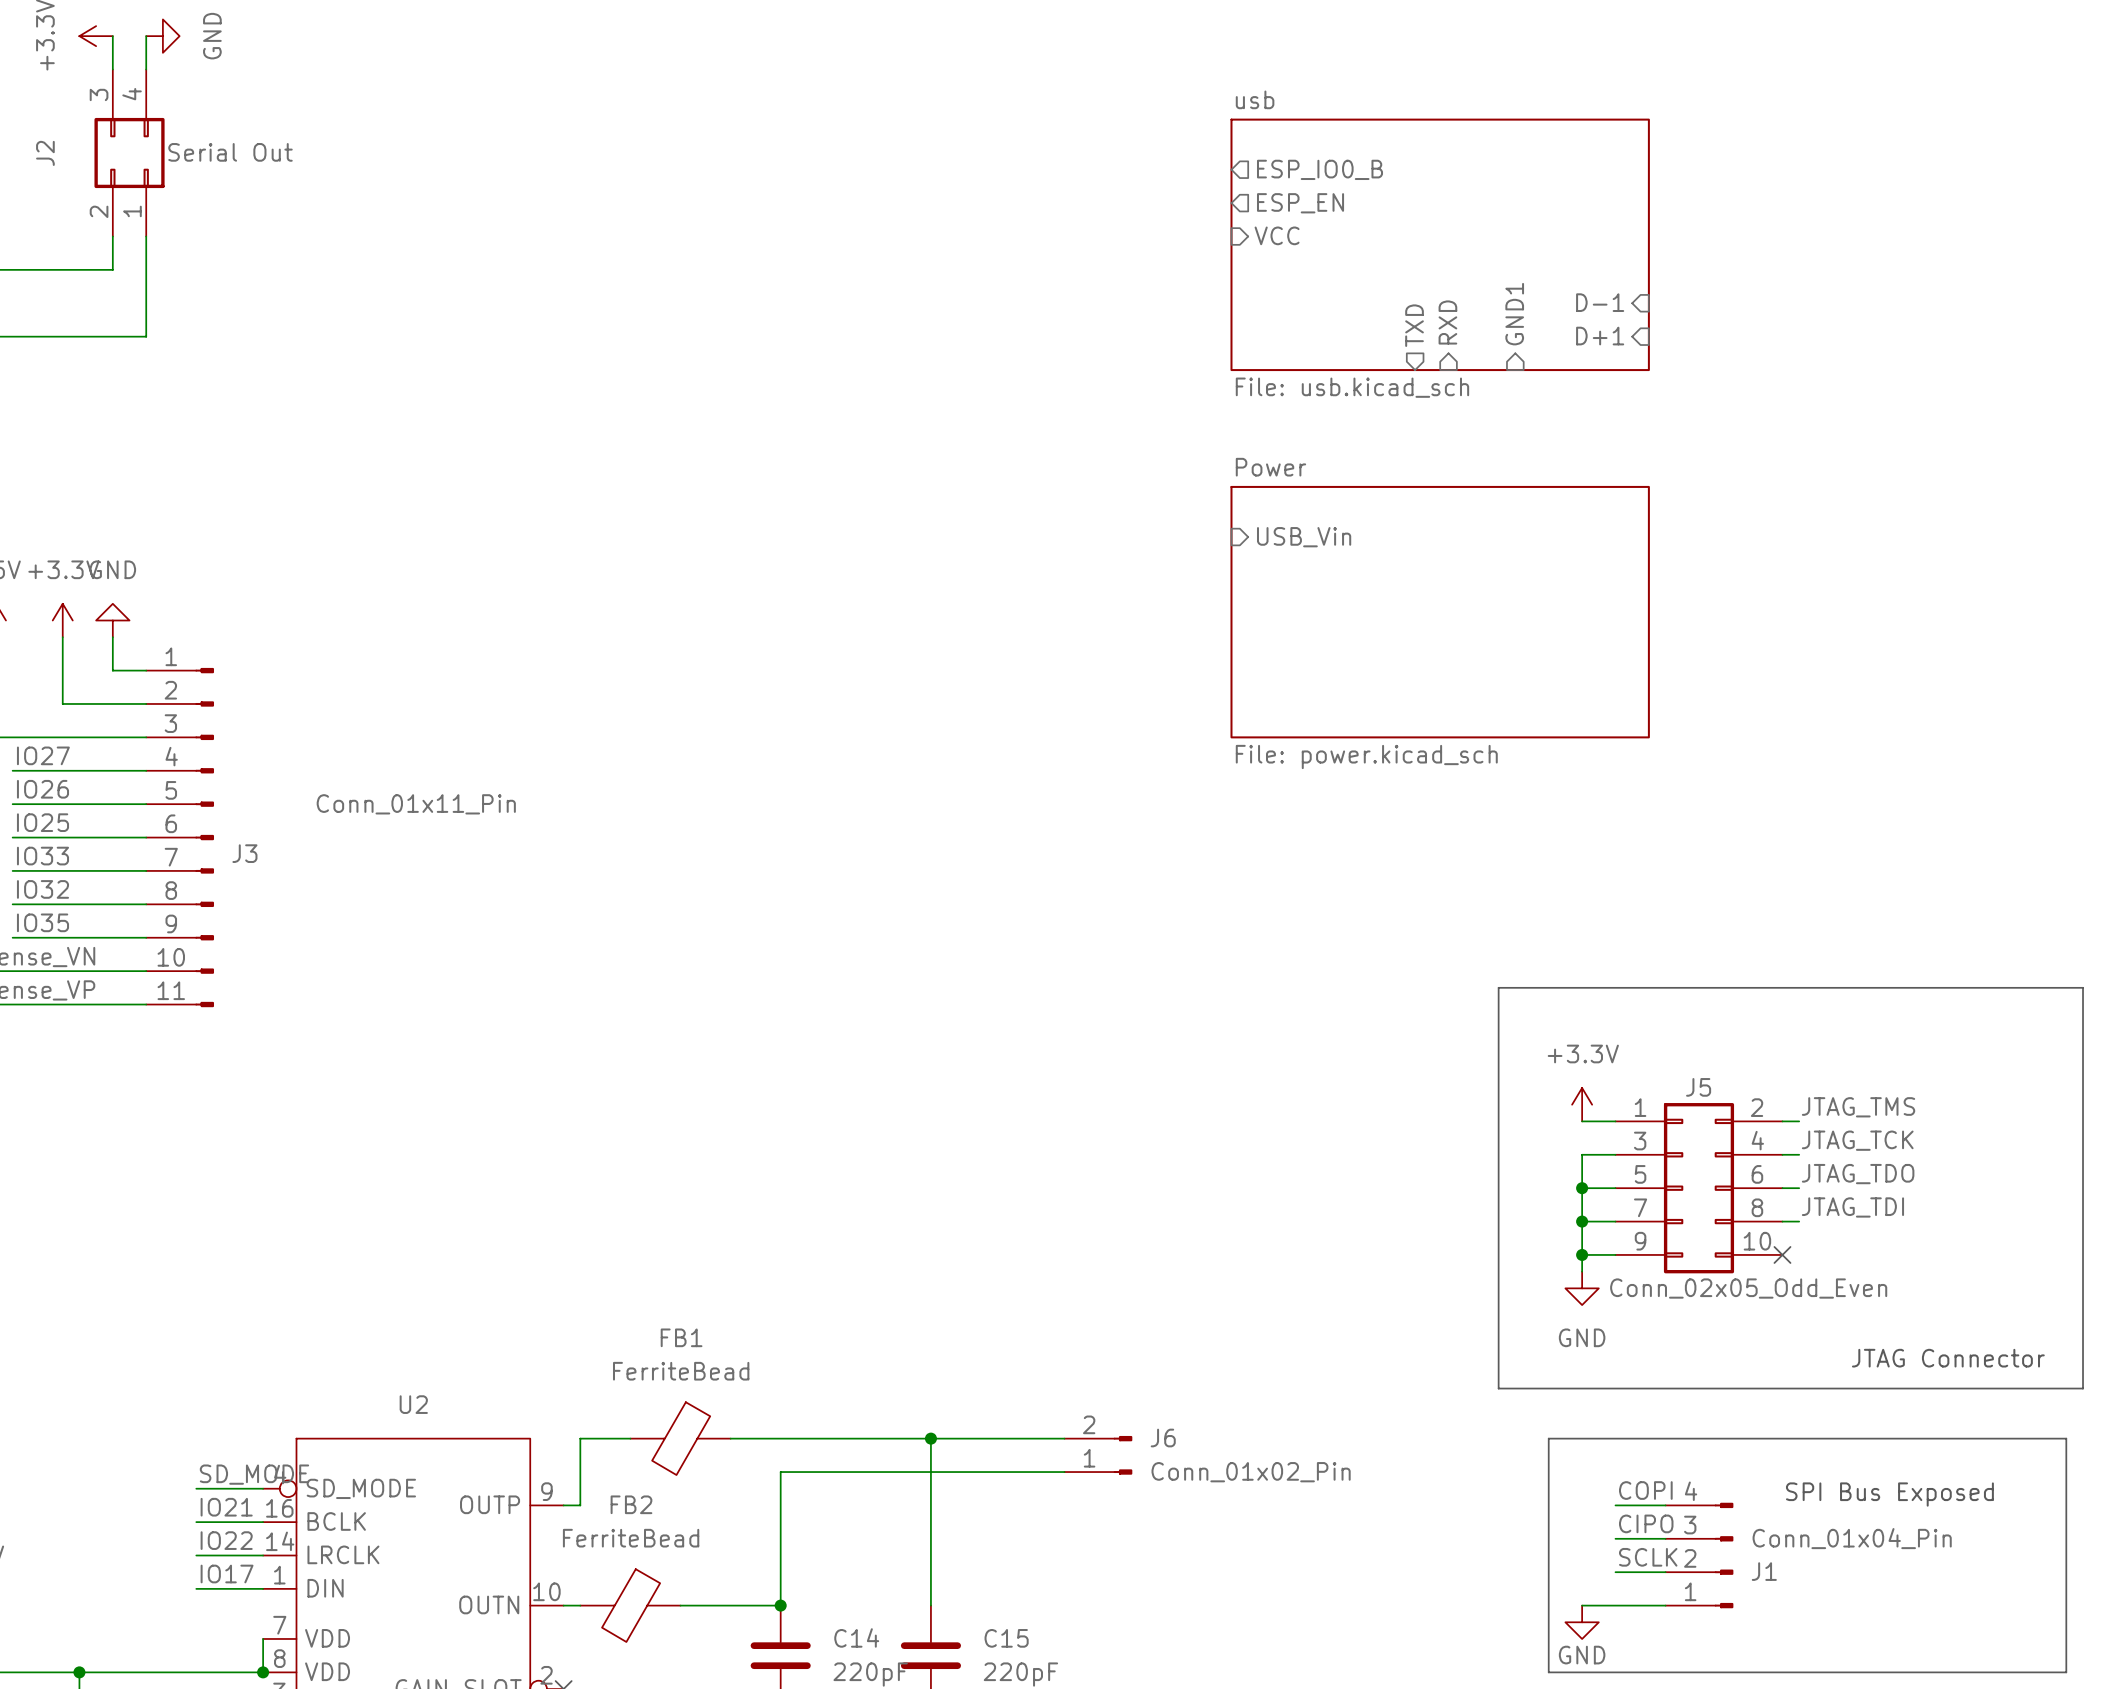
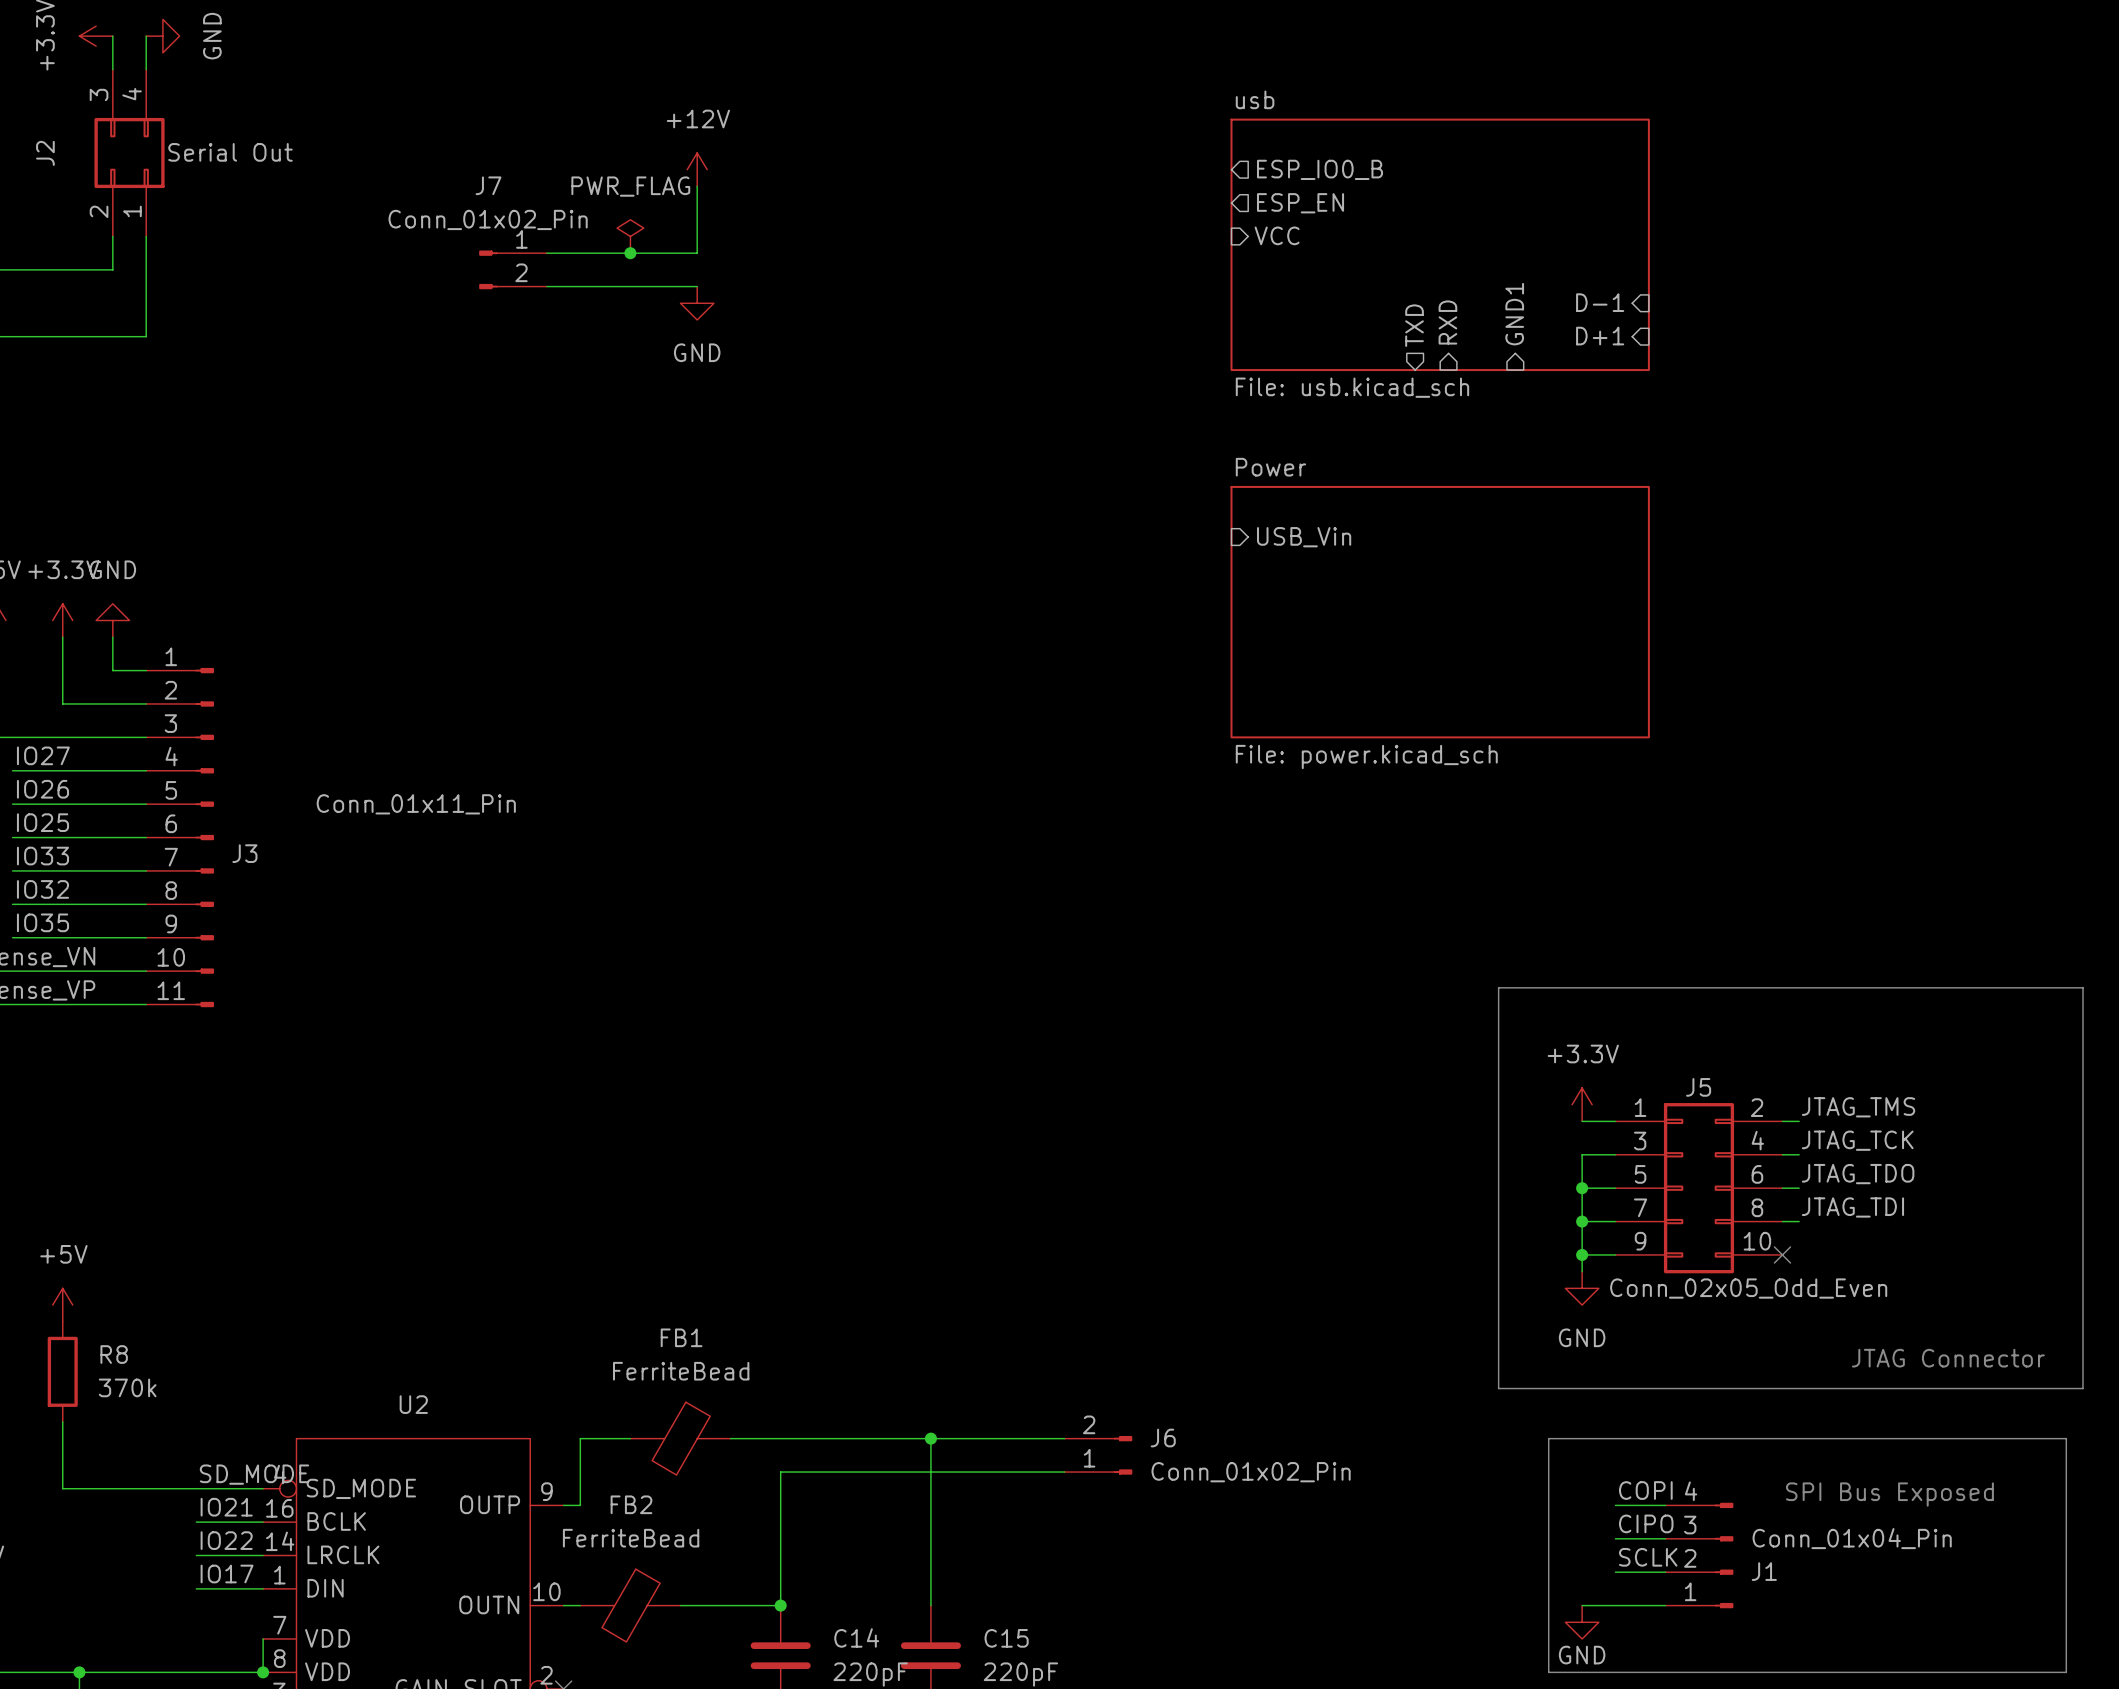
power symbol: none -> +12V (697, 169)
wire: none -> (697, 186) (697, 253) (546, 253)
power symbol: none -> PWR_FLAG (630, 236)
junction: none -> (630, 253)
J7: none -> Conn_01x02_Pin (513, 269)
wire: none -> (546, 286) (697, 286)
power symbol: none -> GND (697, 303)
power symbol: none -> +5V (62, 1305)
R8: none -> 370k (62, 1371)
wire: none -> (62, 1421) (62, 1488) (196, 1488)

